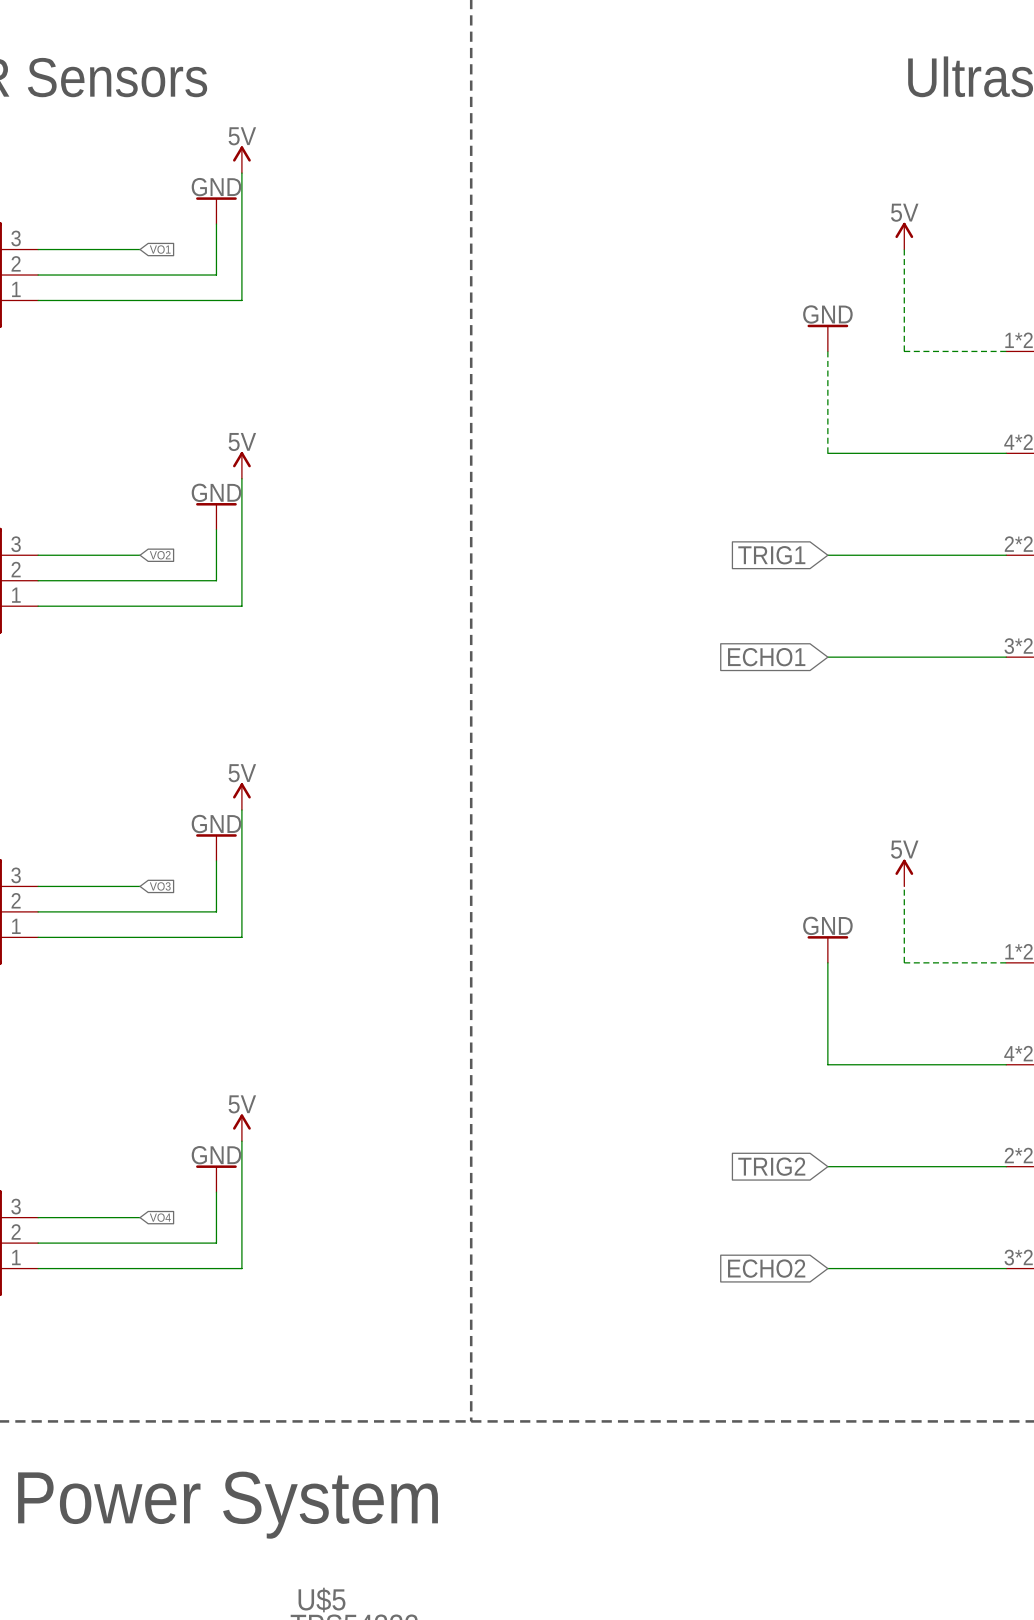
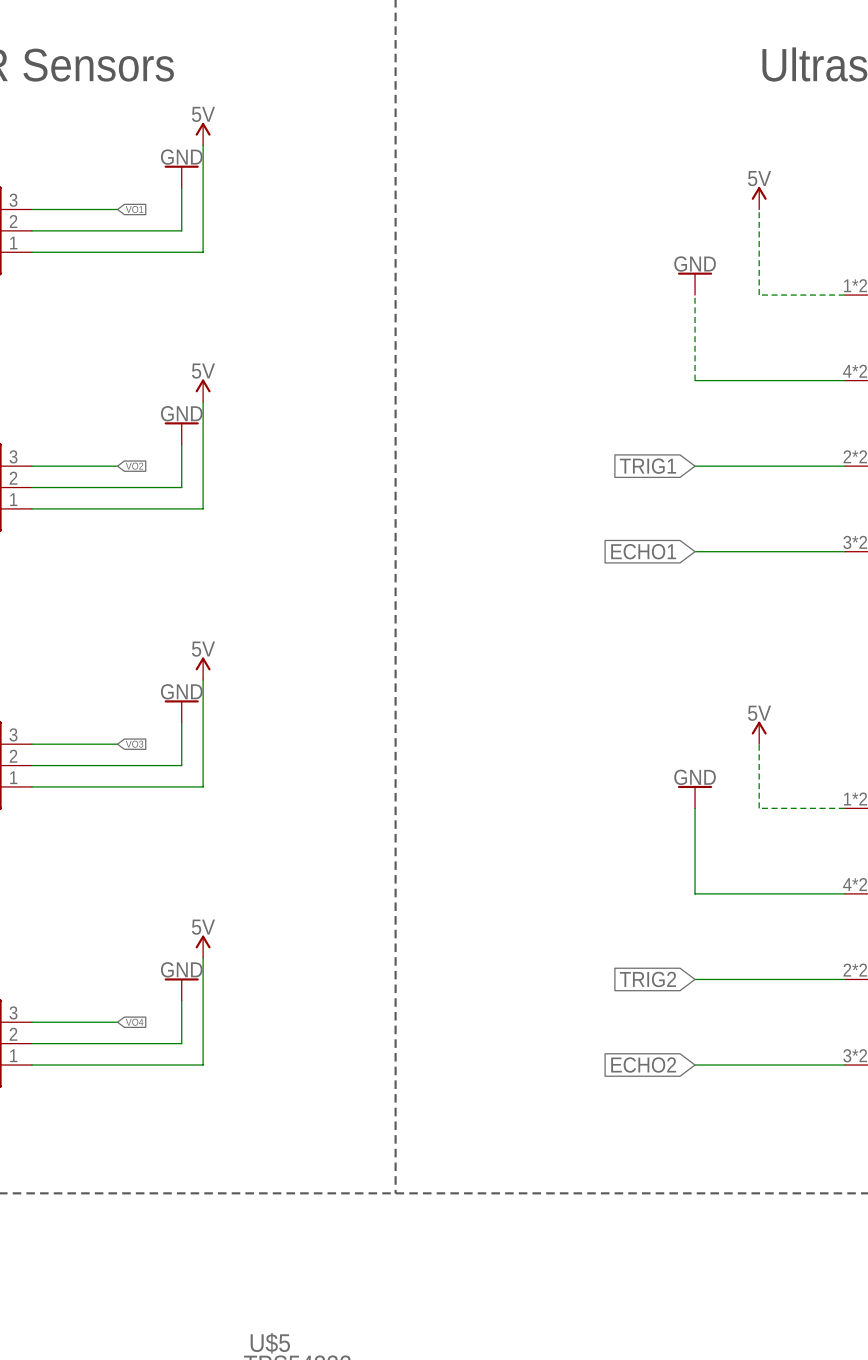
text: Power System (228, 1505) -> none

